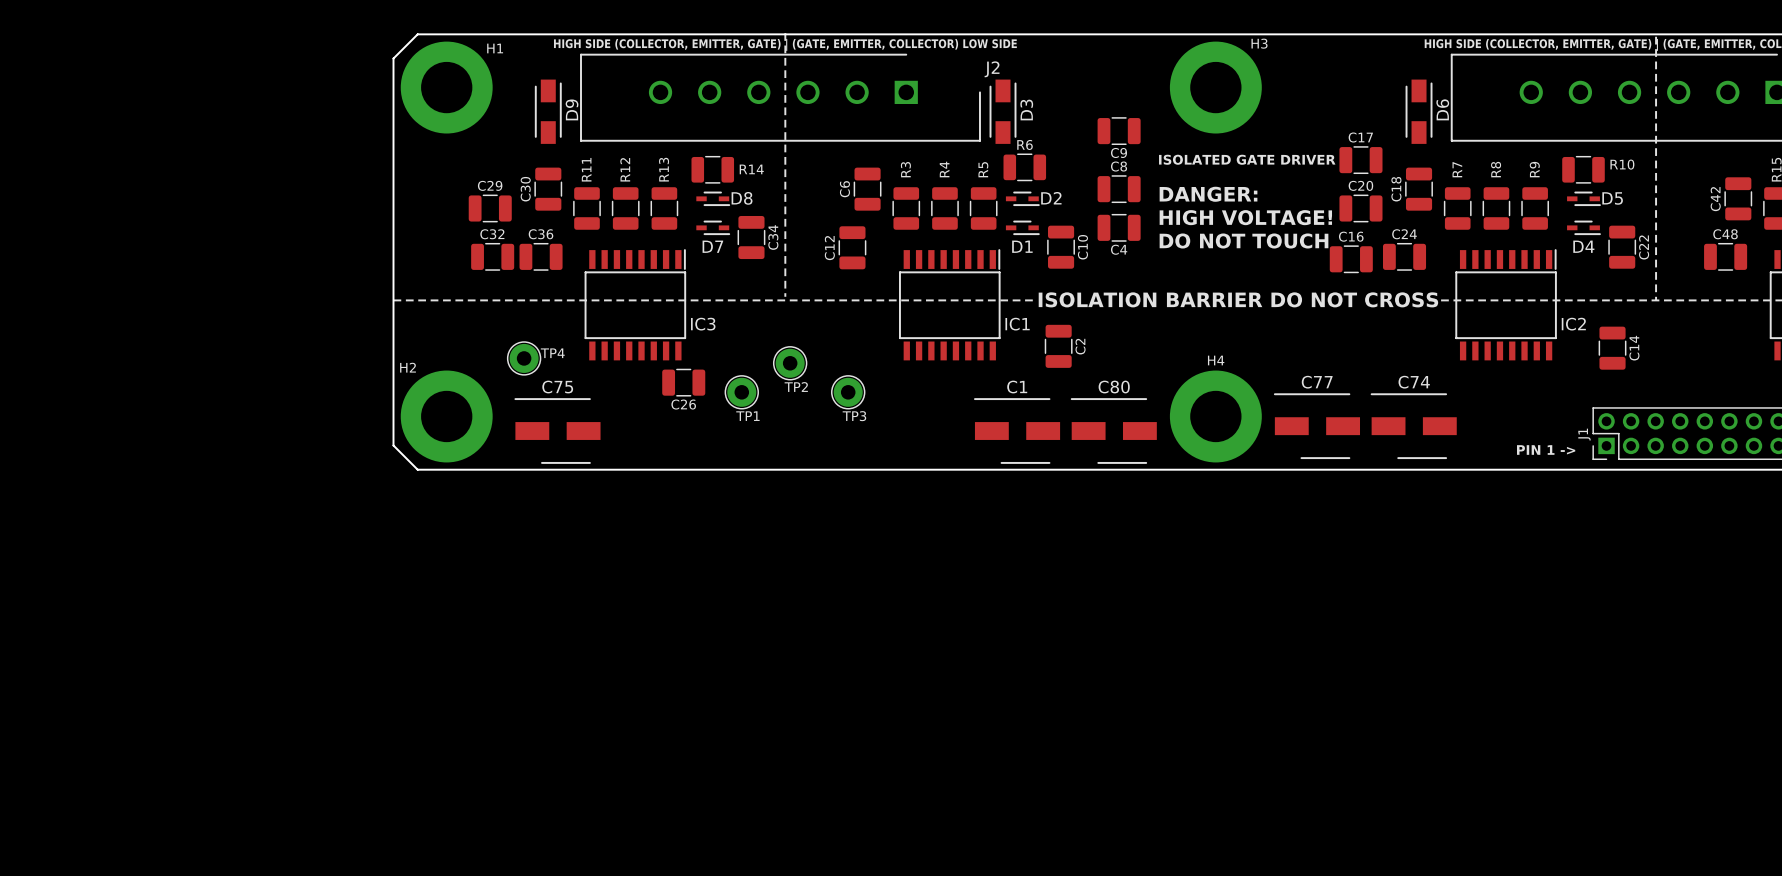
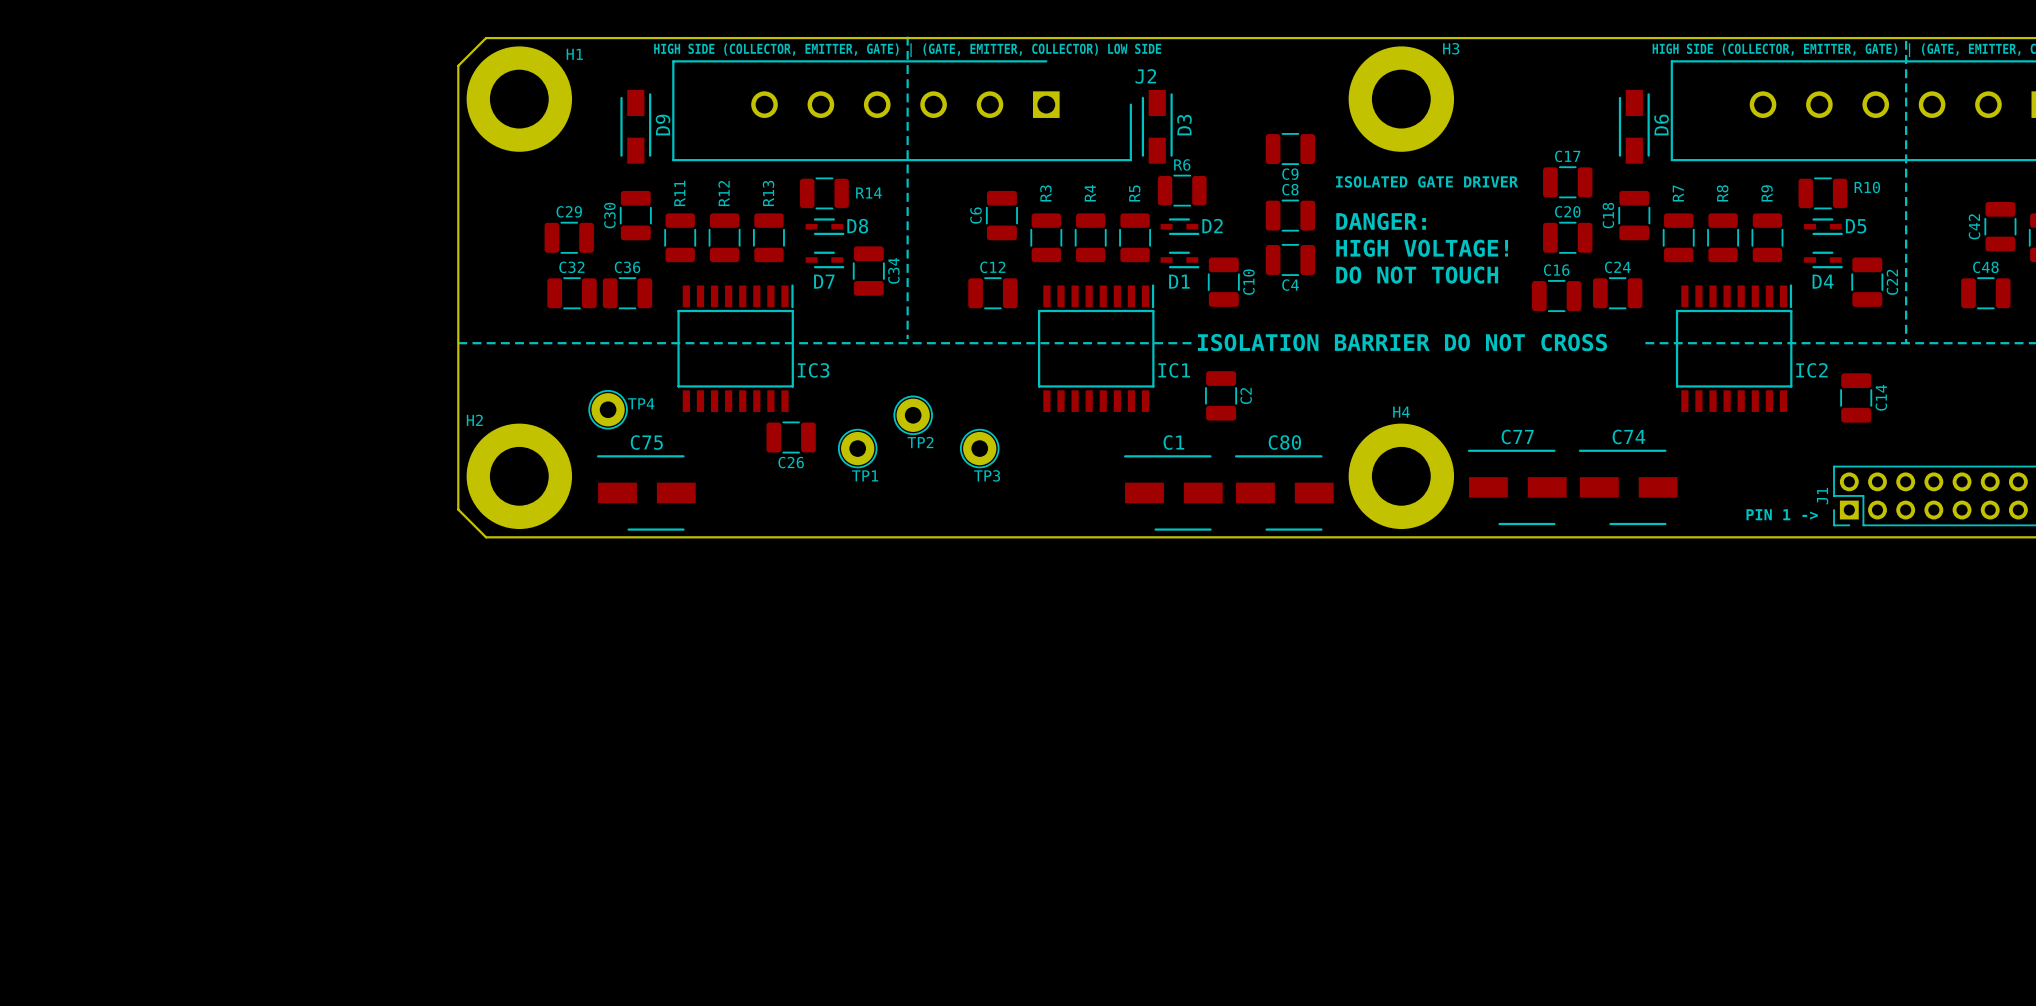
C12 rotation: 0° (852, 247) -> 90° clockwise (992, 293)

